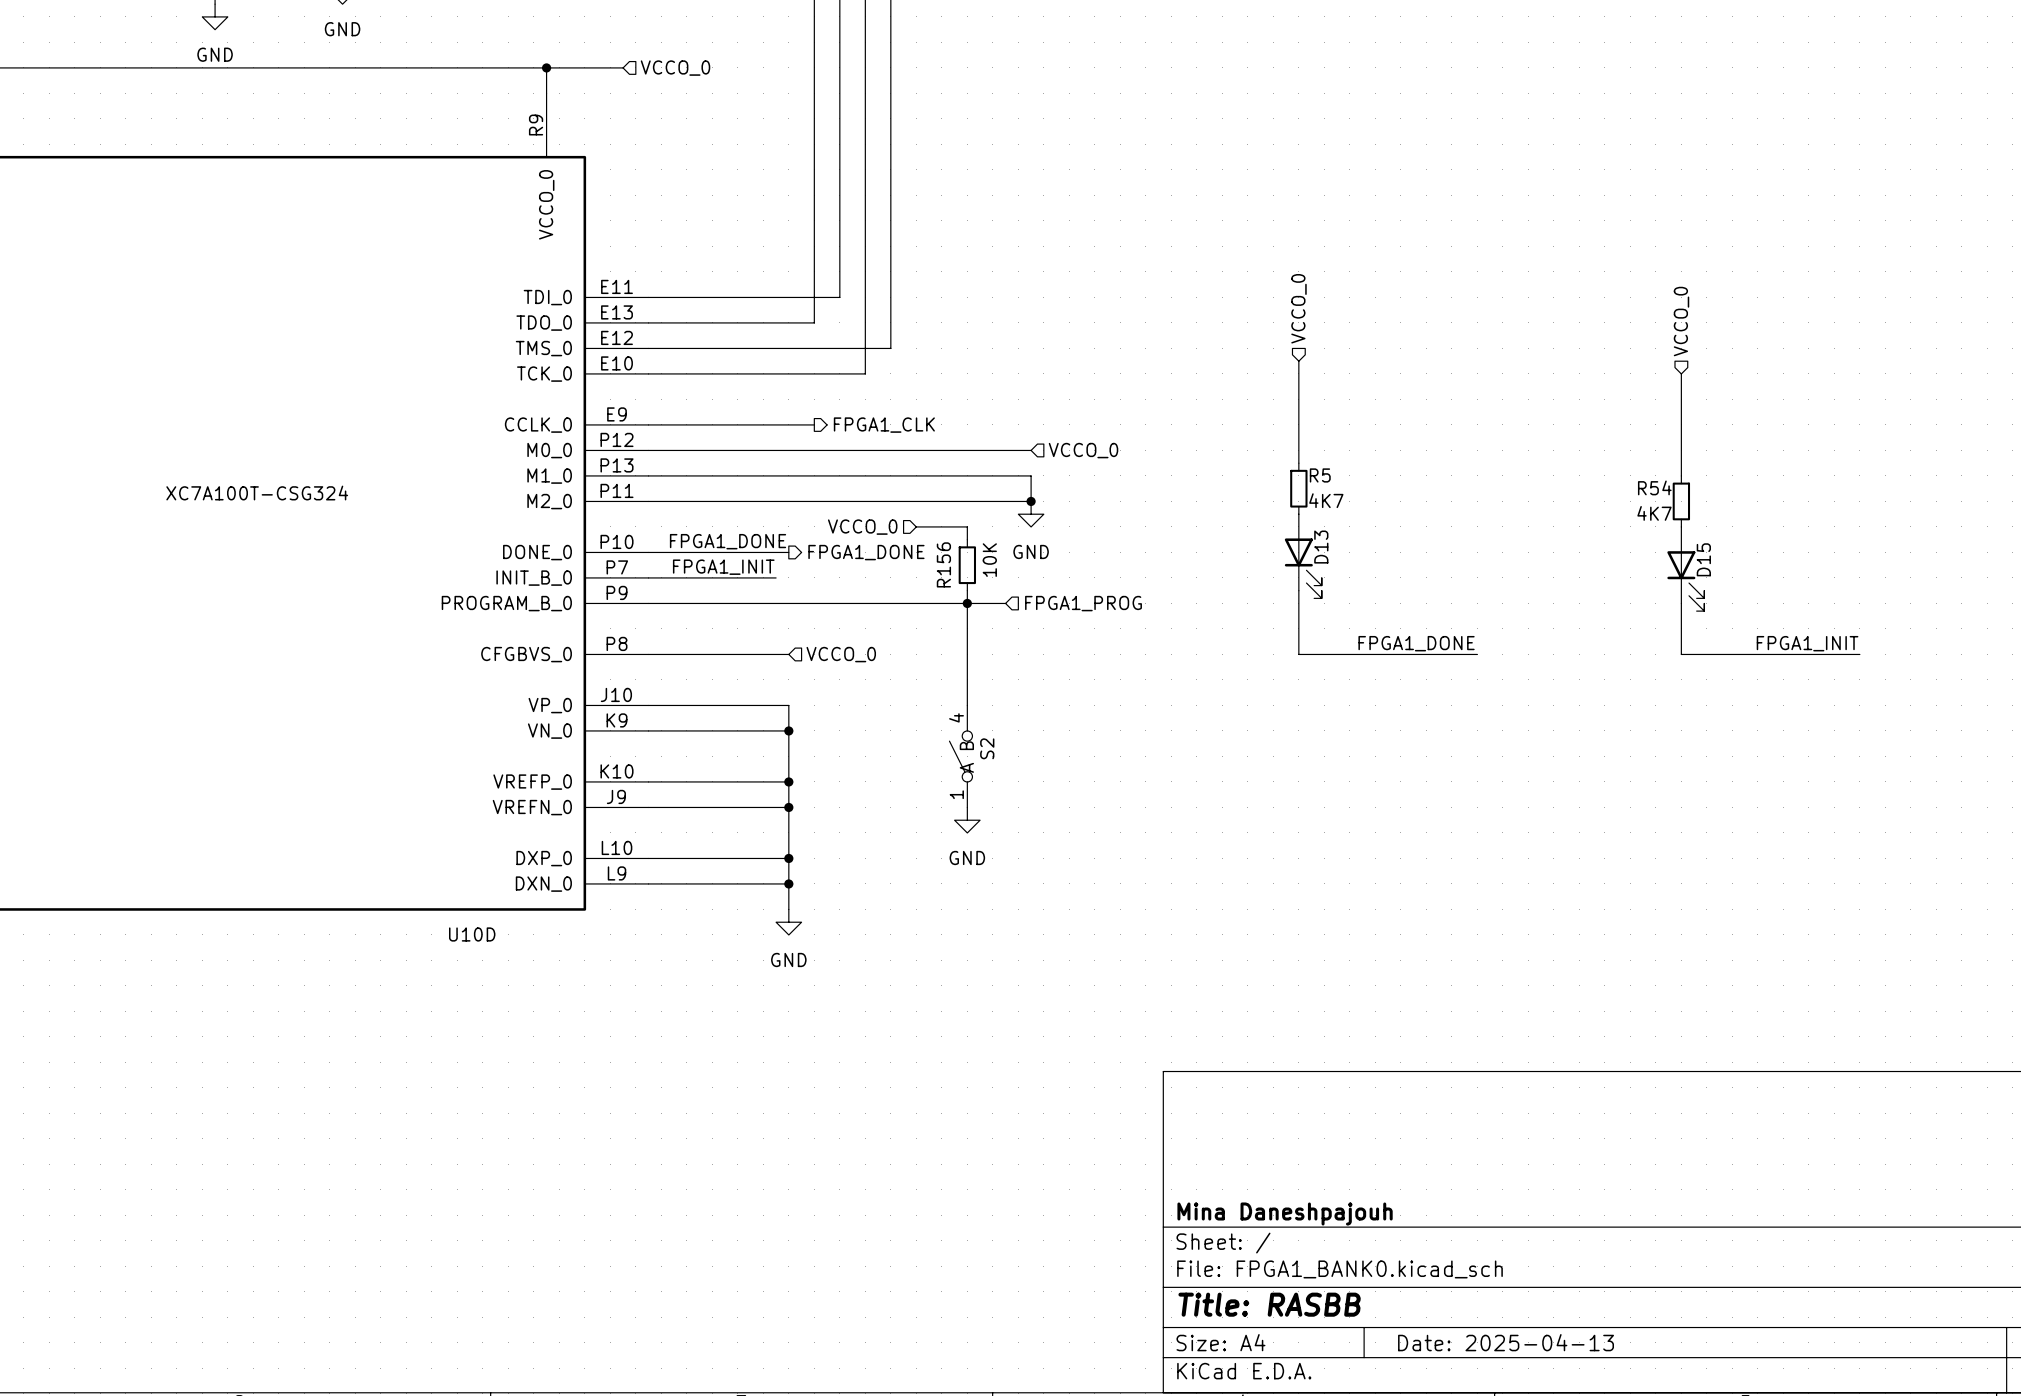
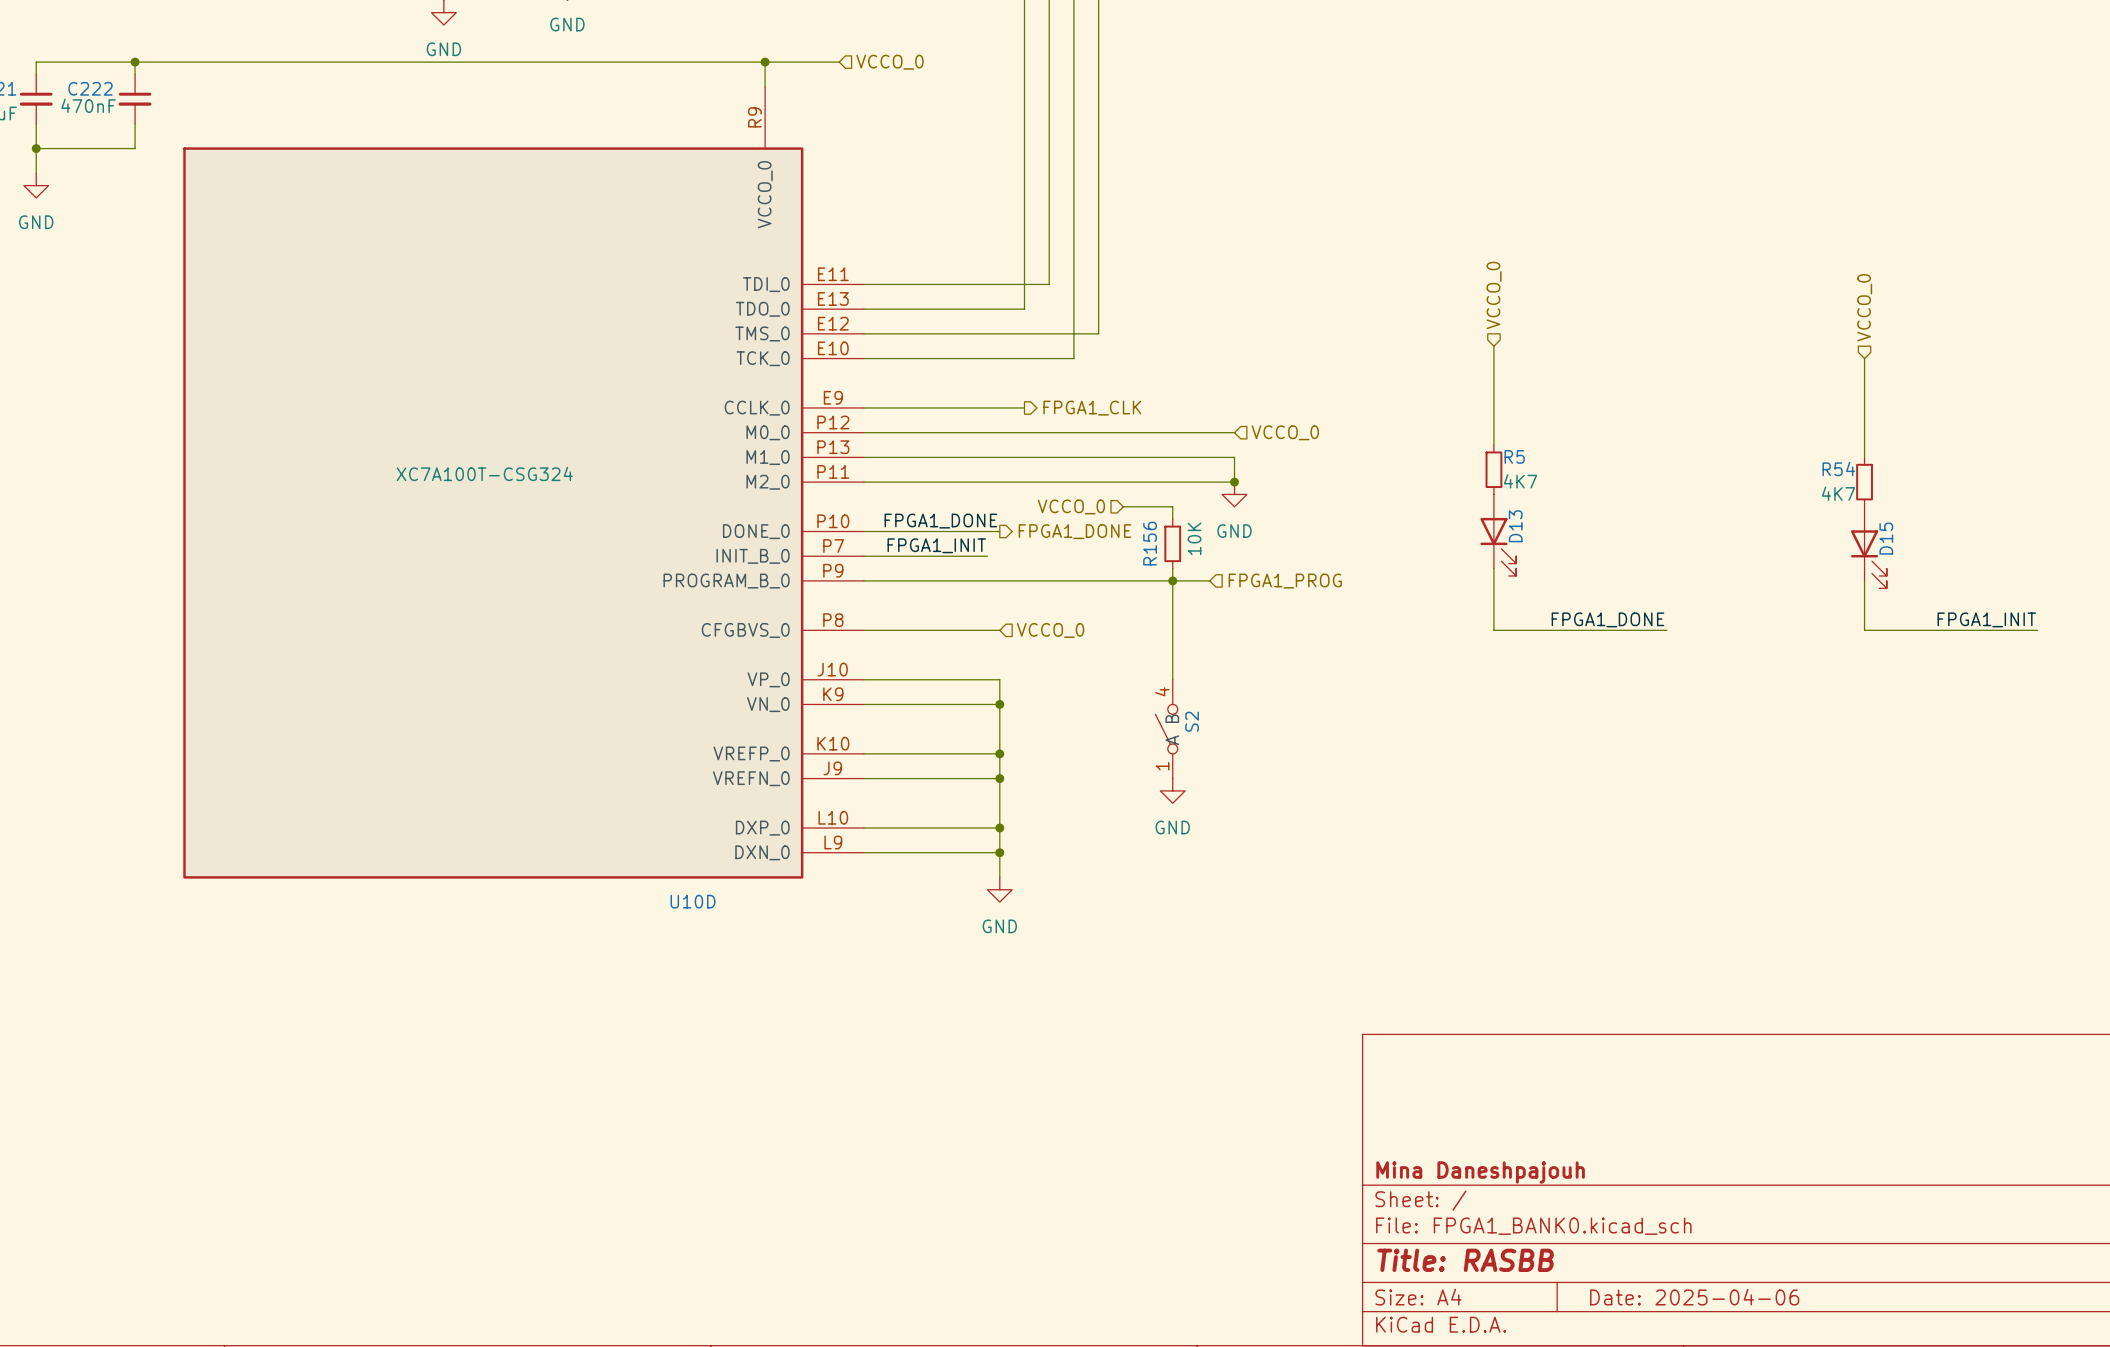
title block: Date: 2025-04-13 (1506, 1342) -> Date: 2025-04-06 (1694, 1297)

